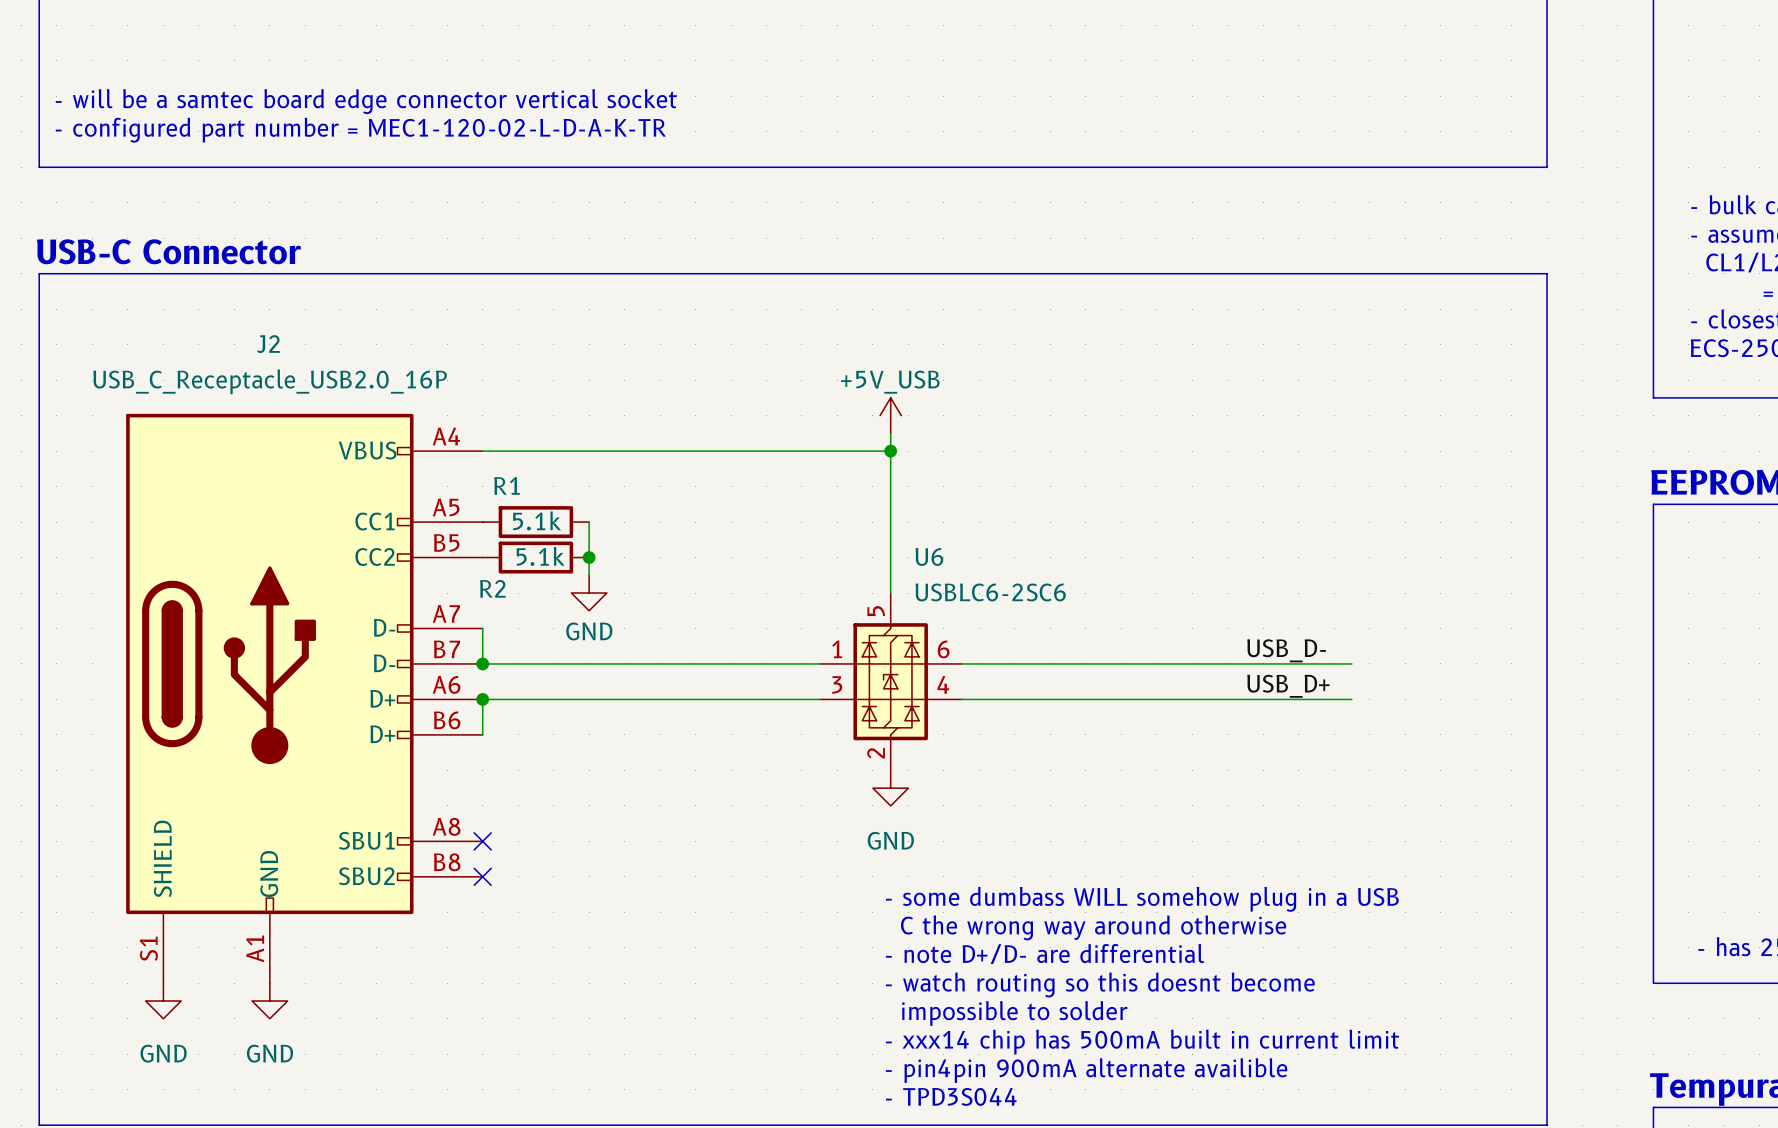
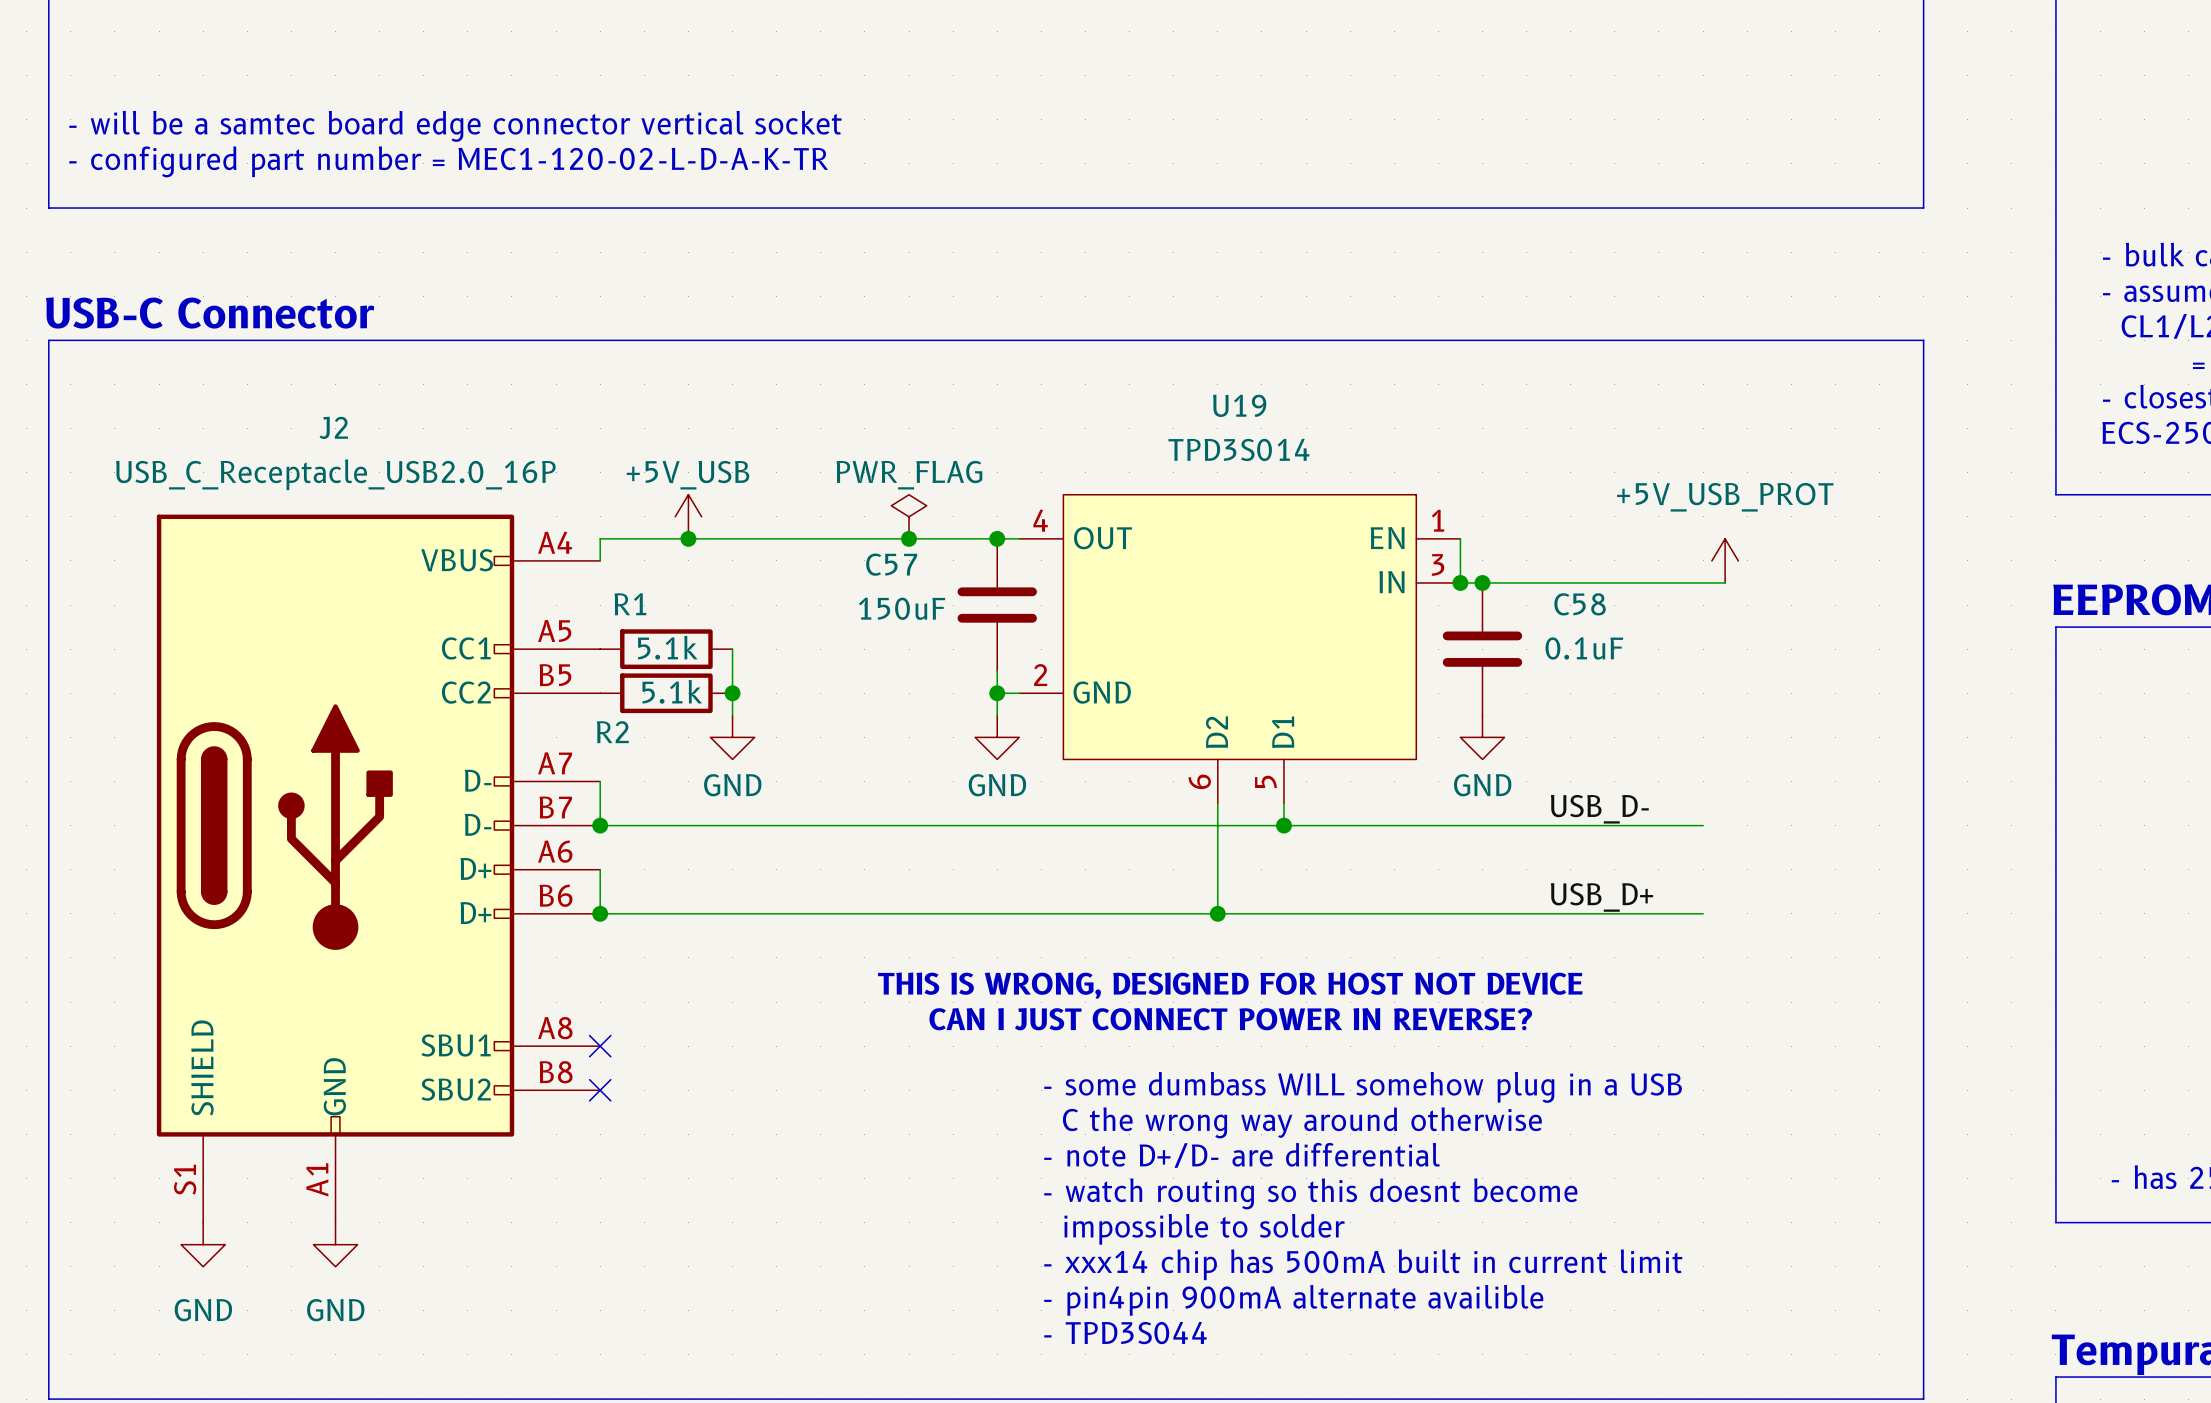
power symbol: none -> PWR_FLAG (909, 516)
power symbol position: +5V_USB (890, 415) -> +5V_USB (688, 516)
junction: none -> (688, 538)
junction: none -> (909, 538)
junction: none -> (997, 538)
wire: none -> (1460, 538) (1460, 582) (1725, 582)
wire: (482, 451) (890, 451) -> (600, 560) (600, 538) (1019, 538)
junction: (890, 451) -> none
power symbol: none -> +5V_USB_PROT (1725, 560)
junction: none -> (1460, 582)
junction: none -> (1482, 582)
C57: none -> 150uF (997, 605)
U19: none -> TPD3S014 (1239, 649)
C58: none -> 0.1uF (1482, 649)
wire: none -> (997, 671) (997, 715)
wire: none -> (997, 693) (1019, 693)
junction: none -> (997, 693)
power symbol: none -> GND (997, 737)
power symbol: none -> GND (1482, 737)
wire: none -> (1217, 803) (1217, 913)
wire: none -> (1283, 803) (1283, 825)
junction: none -> (1283, 825)
wire: none -> (1680, 825) (1703, 825)
U6: USBLC6-2SC6 (890, 681) -> none
label position: USB_D+ (1288, 686) -> USB_D+ (1601, 897)
wire: (482, 699) (819, 699) -> none
junction position: (482, 699) -> (600, 913)
wire: (961, 699) (1351, 699) -> none
wire: none -> (600, 913) (1703, 913)
junction: none -> (1217, 913)
power symbol: GND (890, 788) -> none
text: none -> THIS IS WRONG, DESIGNED FOR HOST NOT DEVICE (1230, 985)
text: none -> CAN I JUST CONNECT POWER IN REVERSE? (1230, 1019)
text position: - some dumbass WILL somehow plug in a USB (1142, 899) -> - some dumbass WILL somehow plug in a USB (1363, 1087)
text position: C the wrong way around otherwise (1093, 927) -> C the wrong way around otherwise (1302, 1122)
text position: - note D+/D- are differential (1045, 954) -> - note D+/D- are differential (1242, 1155)
text position: - watch routing so this doesnt become (1100, 985) -> - watch routing so this doesnt become (1310, 1193)
text position: impossible to solder (1014, 1013) -> impossible to solder (1204, 1229)
text position: - xxx14 chip has 500mA built in current limit (1142, 1042) -> - xxx14 chip has 500mA built in current limit (1363, 1264)
text position: - pin4pin 900mA alternate availible (1086, 1070) -> - pin4pin 900mA alternate availible (1293, 1300)
text position: - TPD3S044 (951, 1096) -> - TPD3S044 (1125, 1333)

